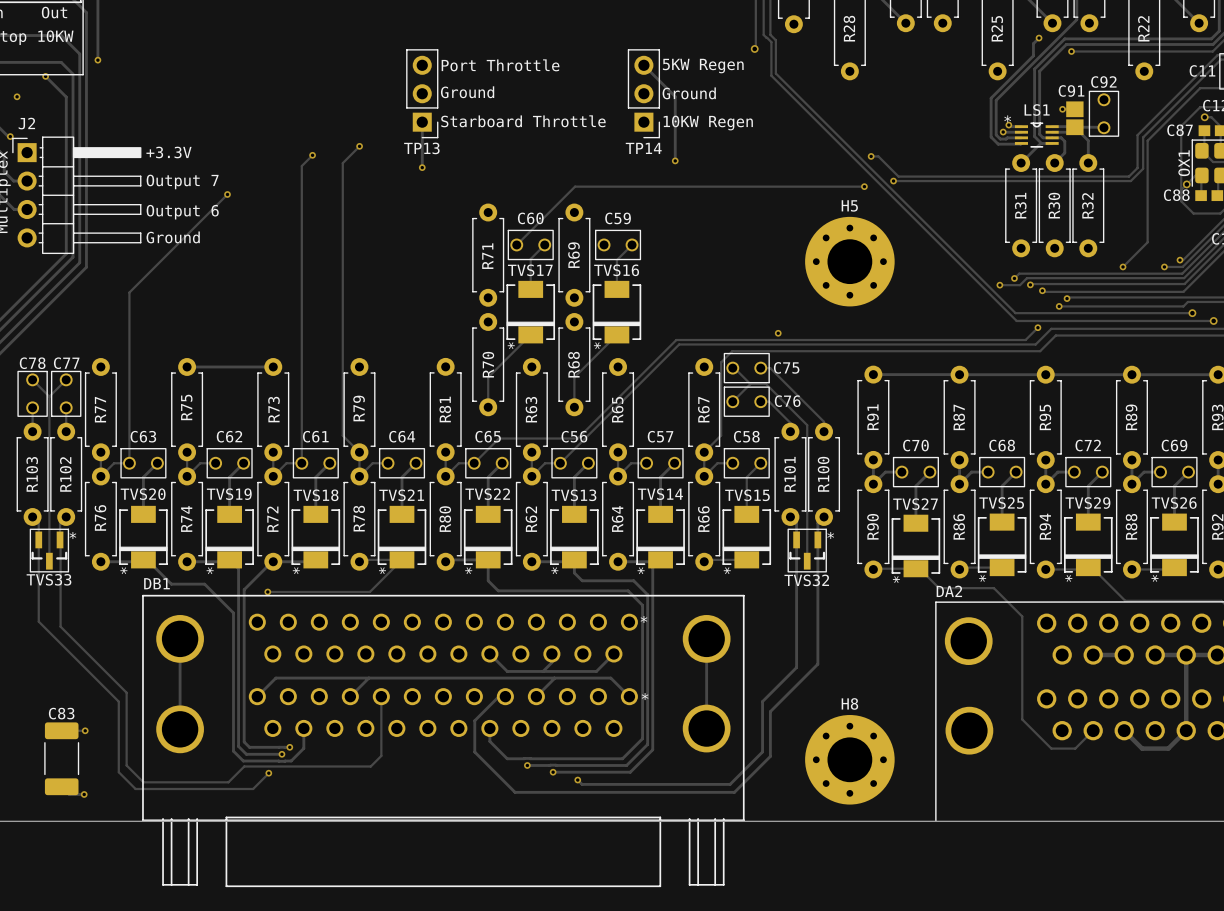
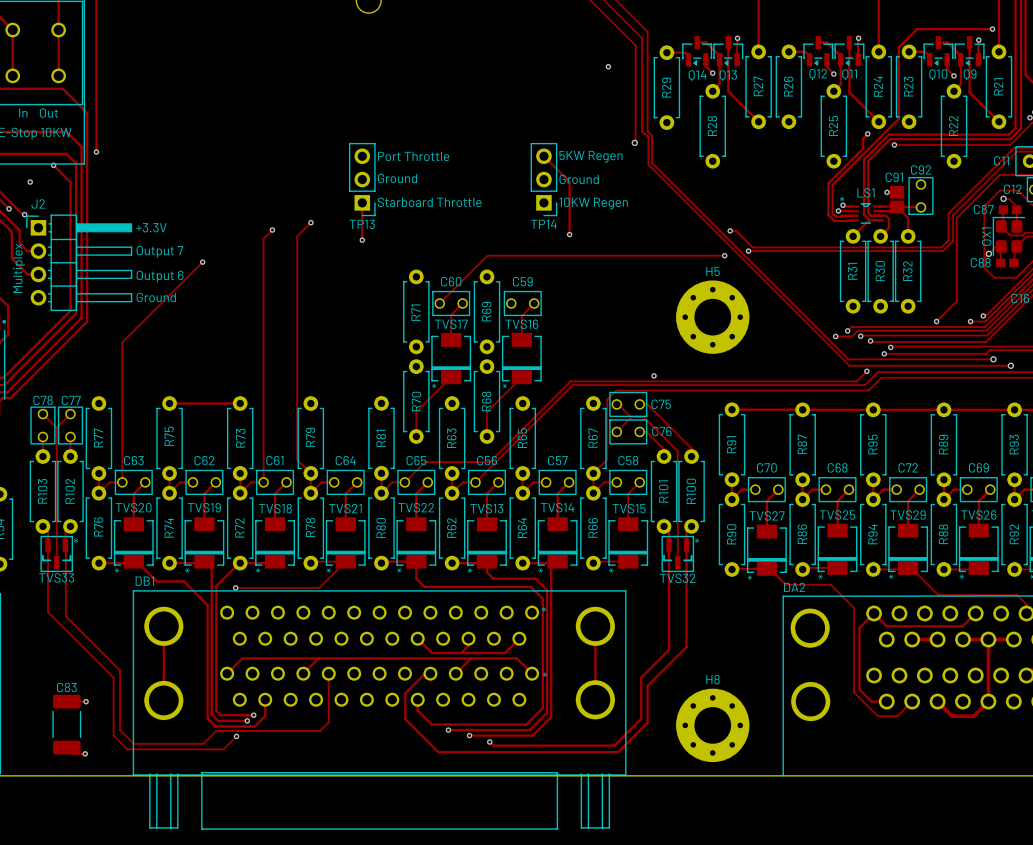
track: none -> (975, 613) (962, 626) (886, 626) (874, 613) (859, 628) (859, 689) (871, 701) (886, 701)

